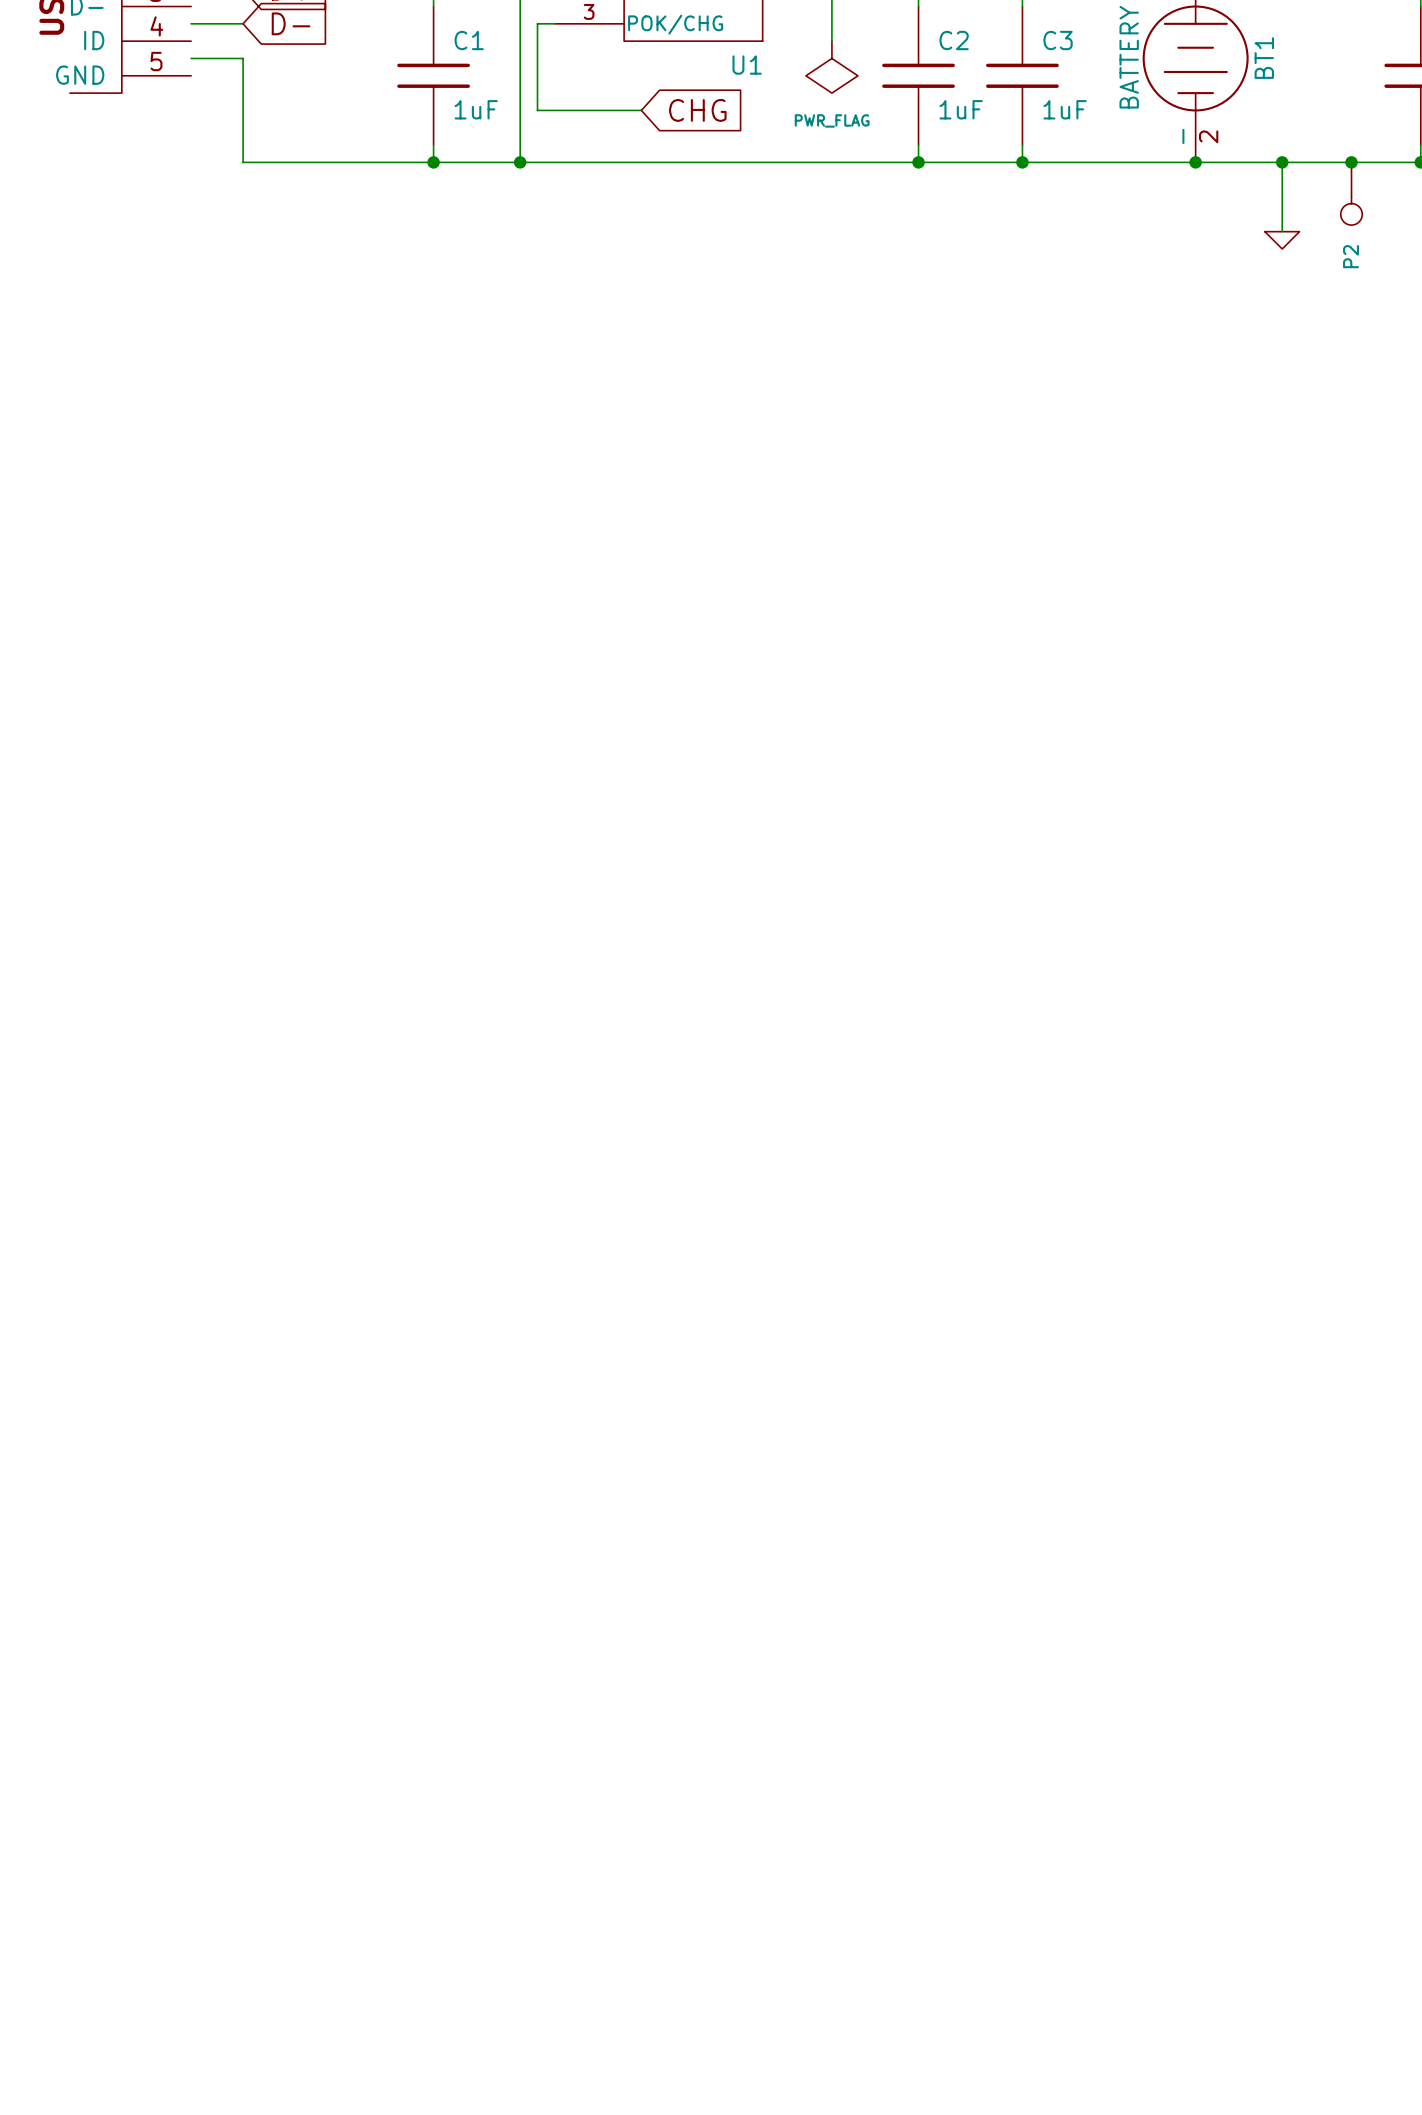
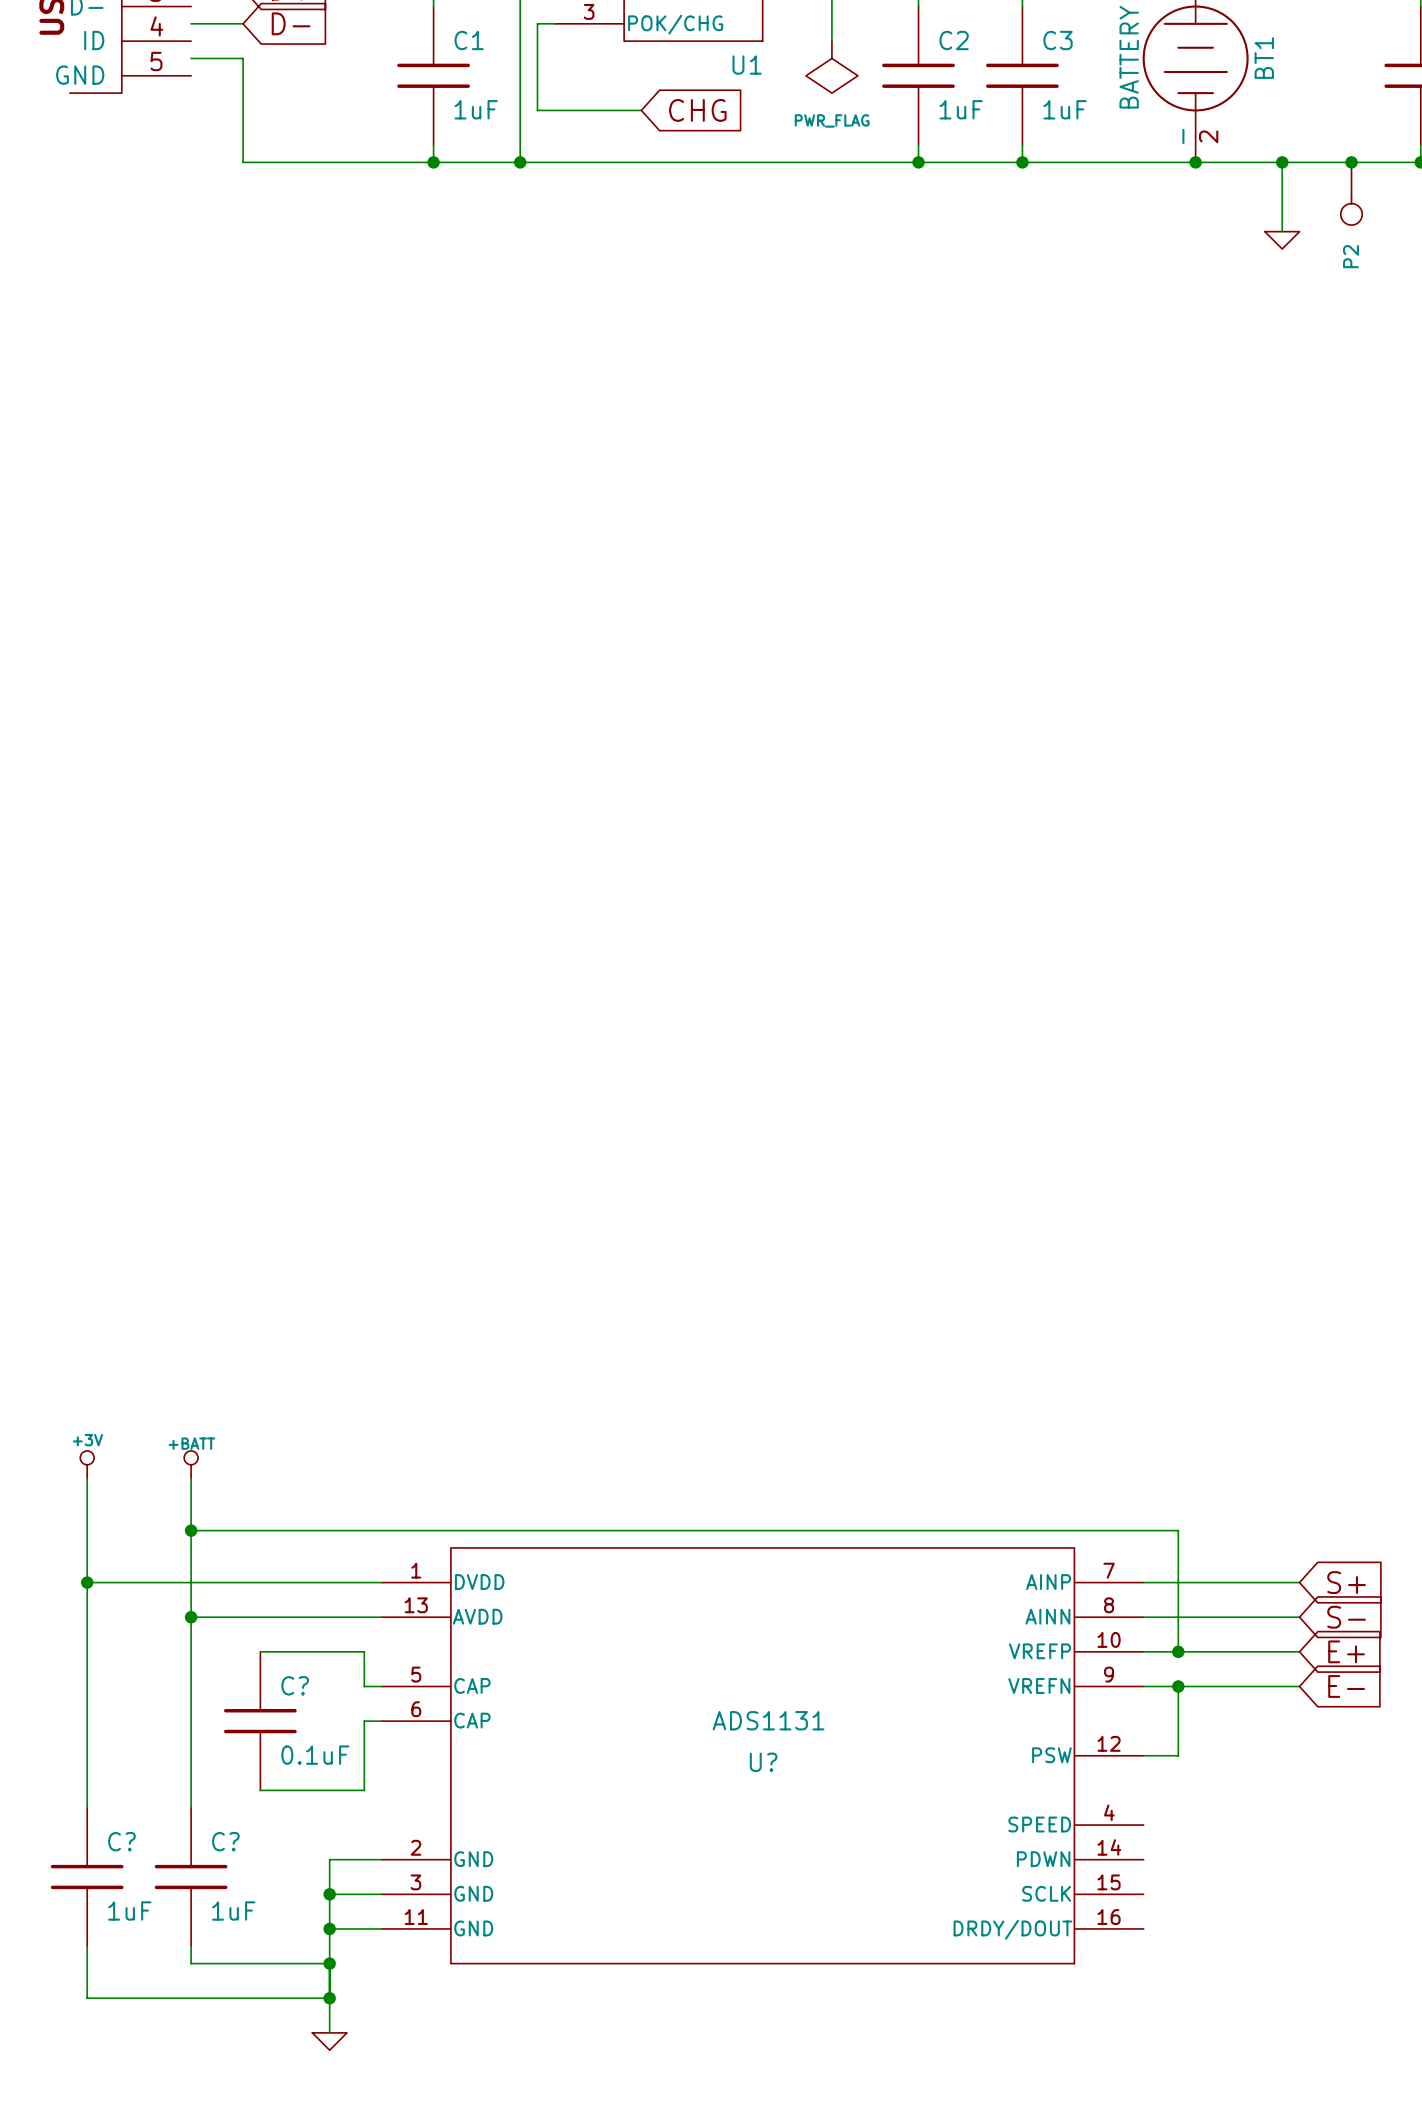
power symbol: none -> +3V (87, 1464)
power symbol: none -> +BATT (191, 1464)
wire: none -> (87, 1478) (87, 1807)
wire: none -> (191, 1478) (191, 1807)
wire: none -> (191, 1530) (1178, 1530) (1178, 1651)
junction: none -> (191, 1530)
wire: none -> (87, 1582) (381, 1582)
junction: none -> (87, 1582)
wire: none -> (1143, 1582) (1299, 1582)
global label: none -> S+ (1346, 1582)
wire: none -> (191, 1617) (381, 1617)
junction: none -> (191, 1617)
wire: none -> (1143, 1617) (1299, 1617)
global label: none -> S- (1346, 1617)
wire: none -> (260, 1651) (364, 1651) (364, 1686) (381, 1686)
wire: none -> (1143, 1651) (1299, 1651)
junction: none -> (1178, 1651)
global label: none -> E+ (1346, 1651)
wire: none -> (1143, 1686) (1299, 1686)
wire: none -> (1178, 1686) (1178, 1755) (1143, 1755)
junction: none -> (1178, 1686)
global label: none -> E- (1346, 1686)
C?: none -> 0.1uF (260, 1721)
wire: none -> (381, 1721) (364, 1721) (364, 1790) (260, 1790)
U?: none -> ADS1131 (762, 1755)
wire: none -> (381, 1859) (329, 1859) (329, 2032)
C?: none -> 1uF (87, 1877)
C?: none -> 1uF (191, 1877)
wire: none -> (329, 1894) (381, 1894)
junction: none -> (329, 1894)
wire: none -> (329, 1928) (381, 1928)
junction: none -> (329, 1928)
wire: none -> (87, 1946) (87, 1998) (329, 1998)
wire: none -> (191, 1946) (191, 1963) (329, 1963)
junction: none -> (329, 1963)
junction: none -> (329, 1998)
power symbol: none -> (329, 2041)

